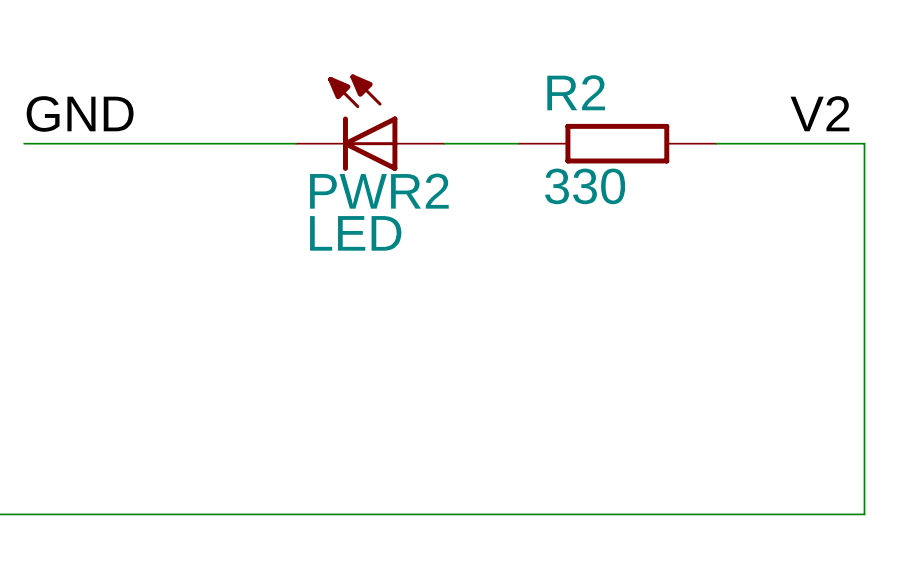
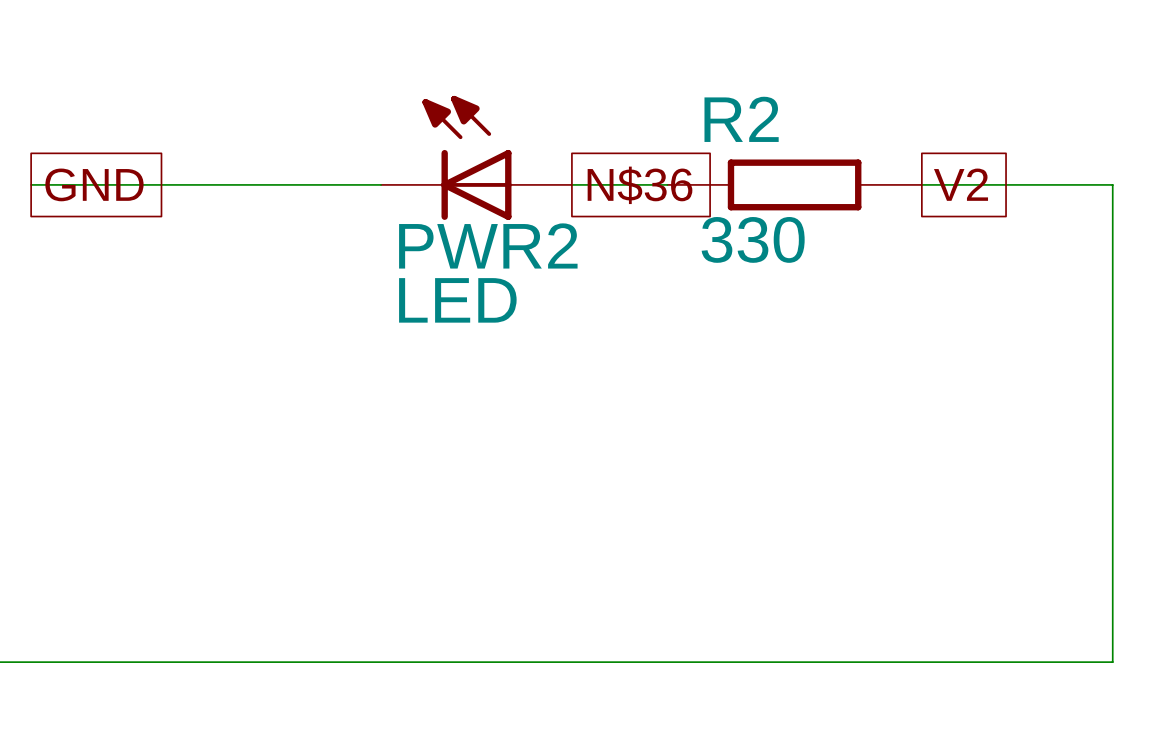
label: GND (80, 113) -> none
label: V2 (819, 113) -> none
global label: none -> GND (94, 184)
global label: none -> N$36 (640, 185)
global label: none -> V2 (961, 184)

